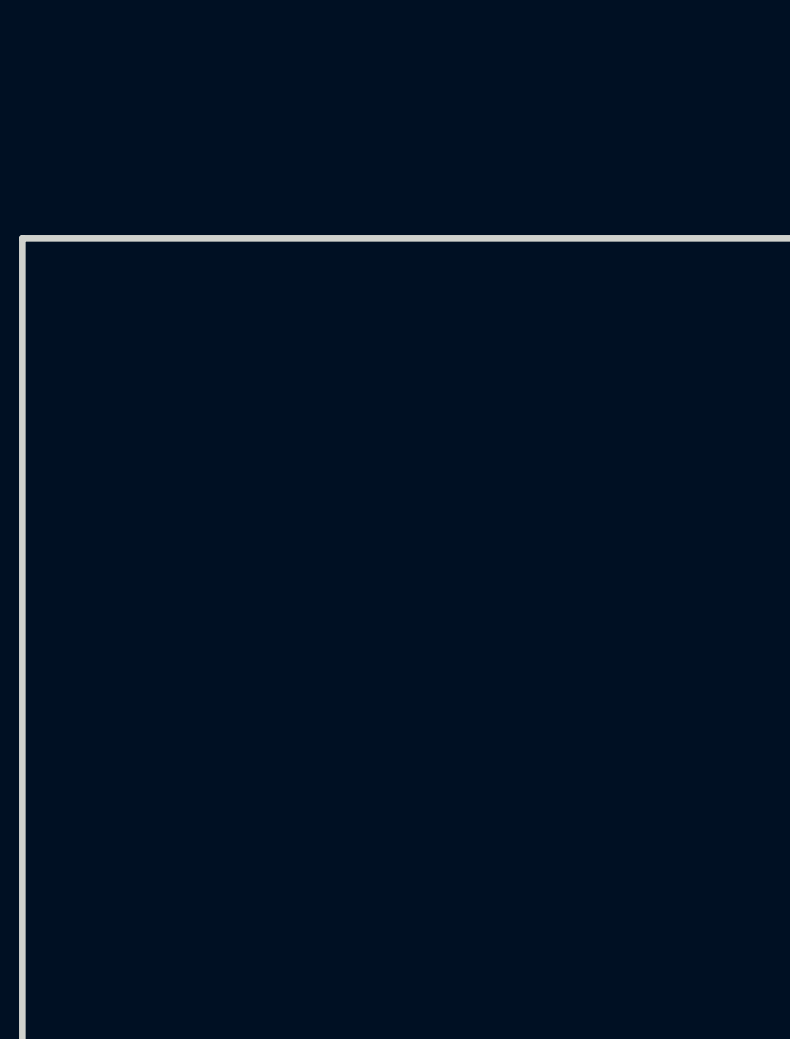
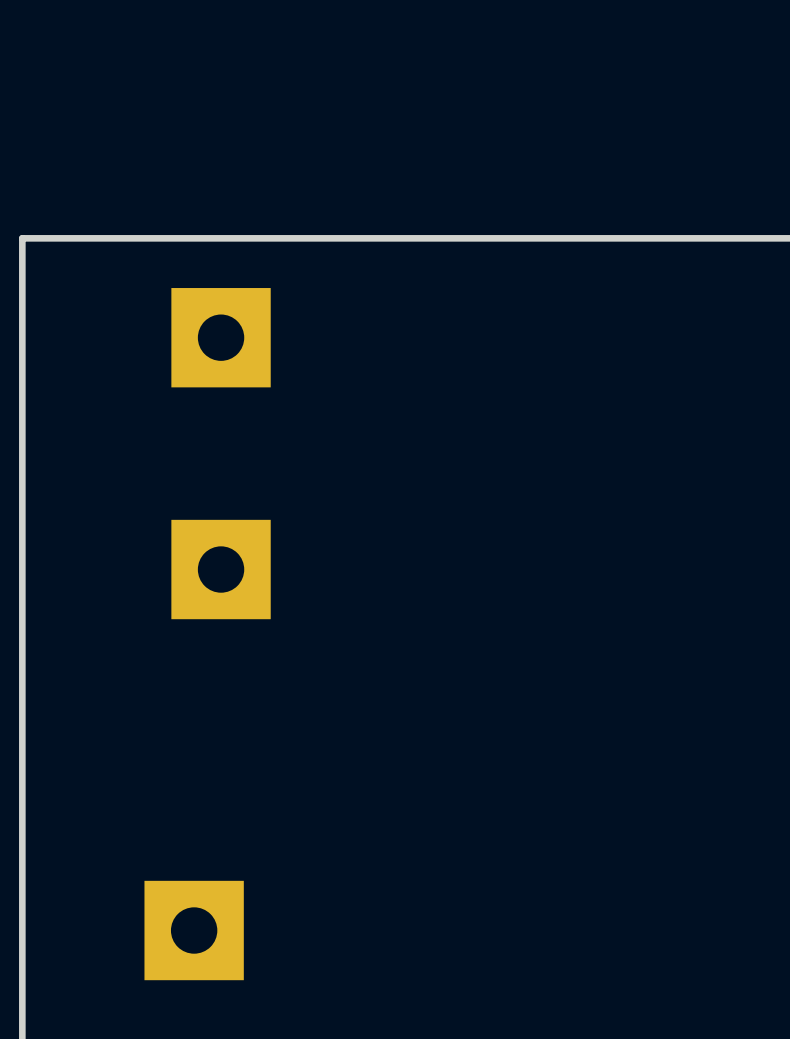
part: none -> (221, 337)
part: none -> (221, 569)
part: none -> (194, 930)

